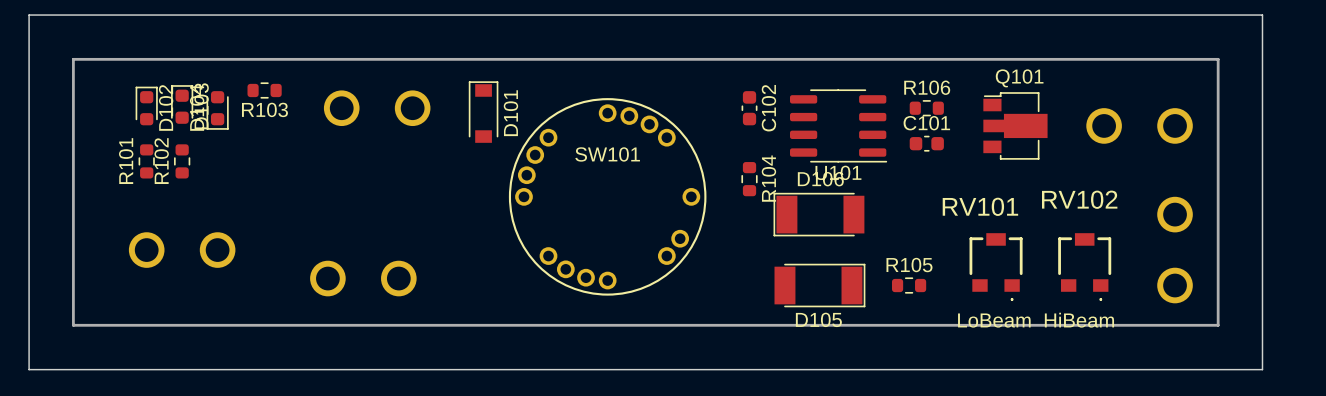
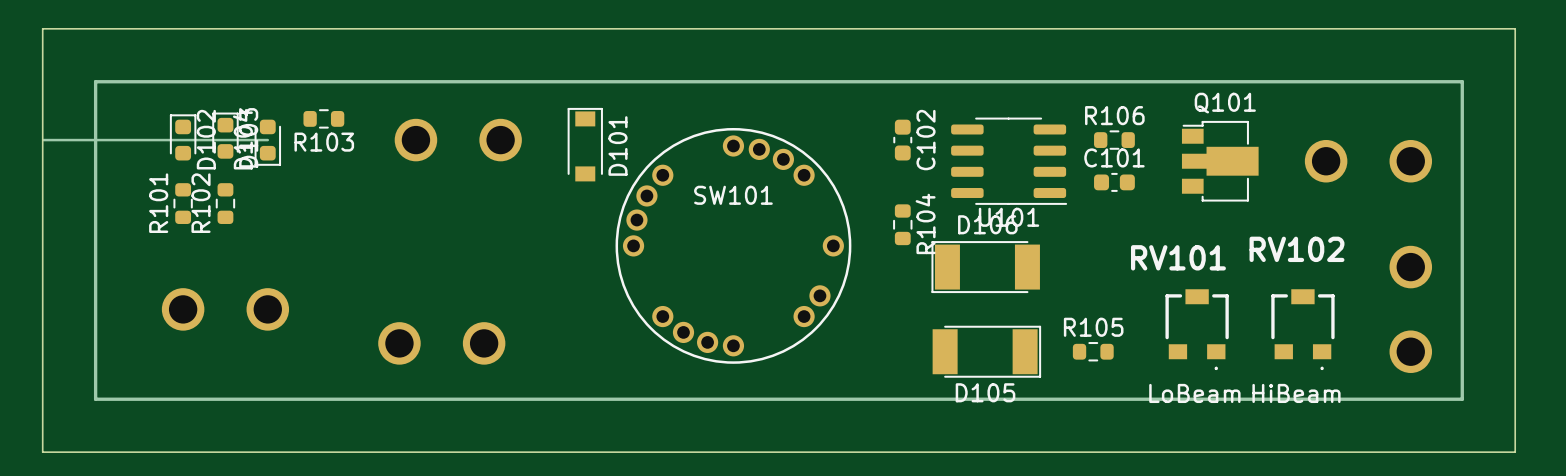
line: none -> (43, 140) (267, 140)

